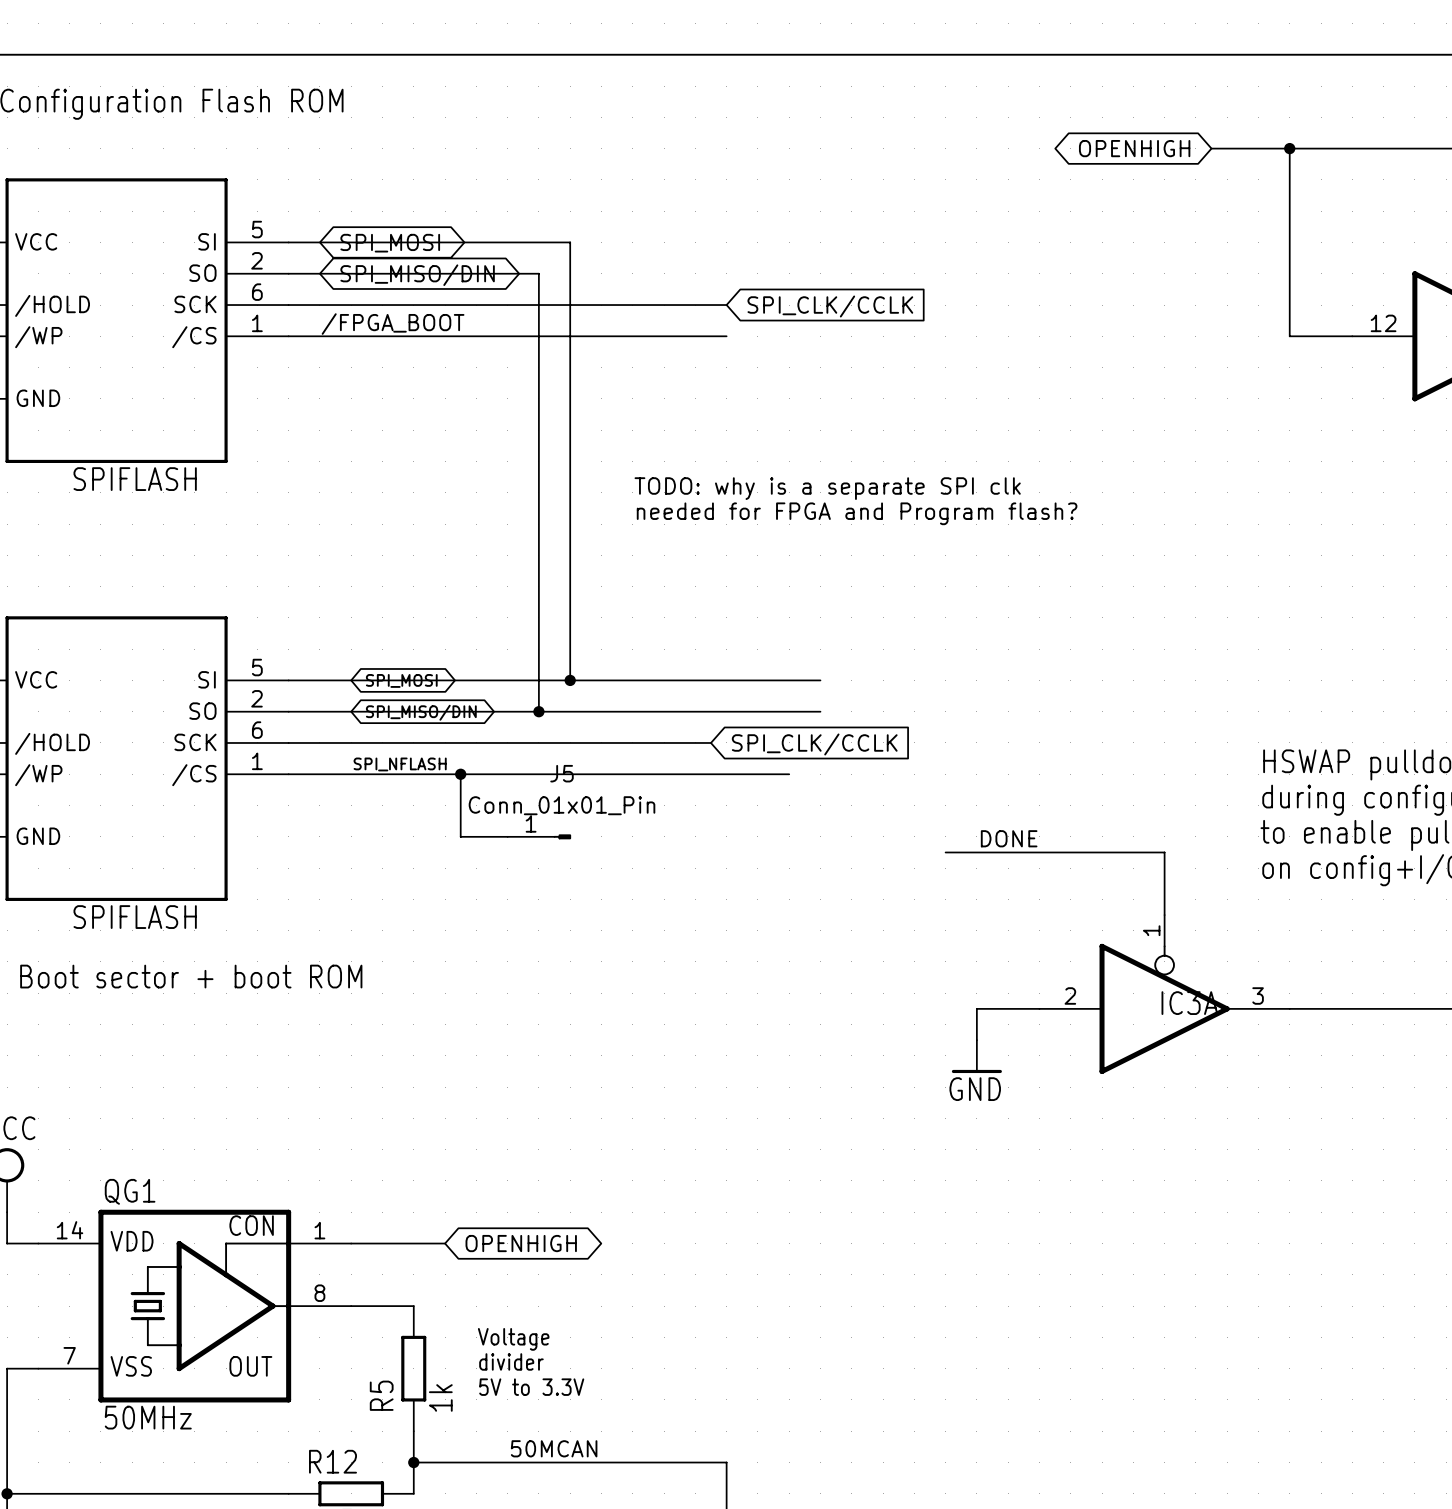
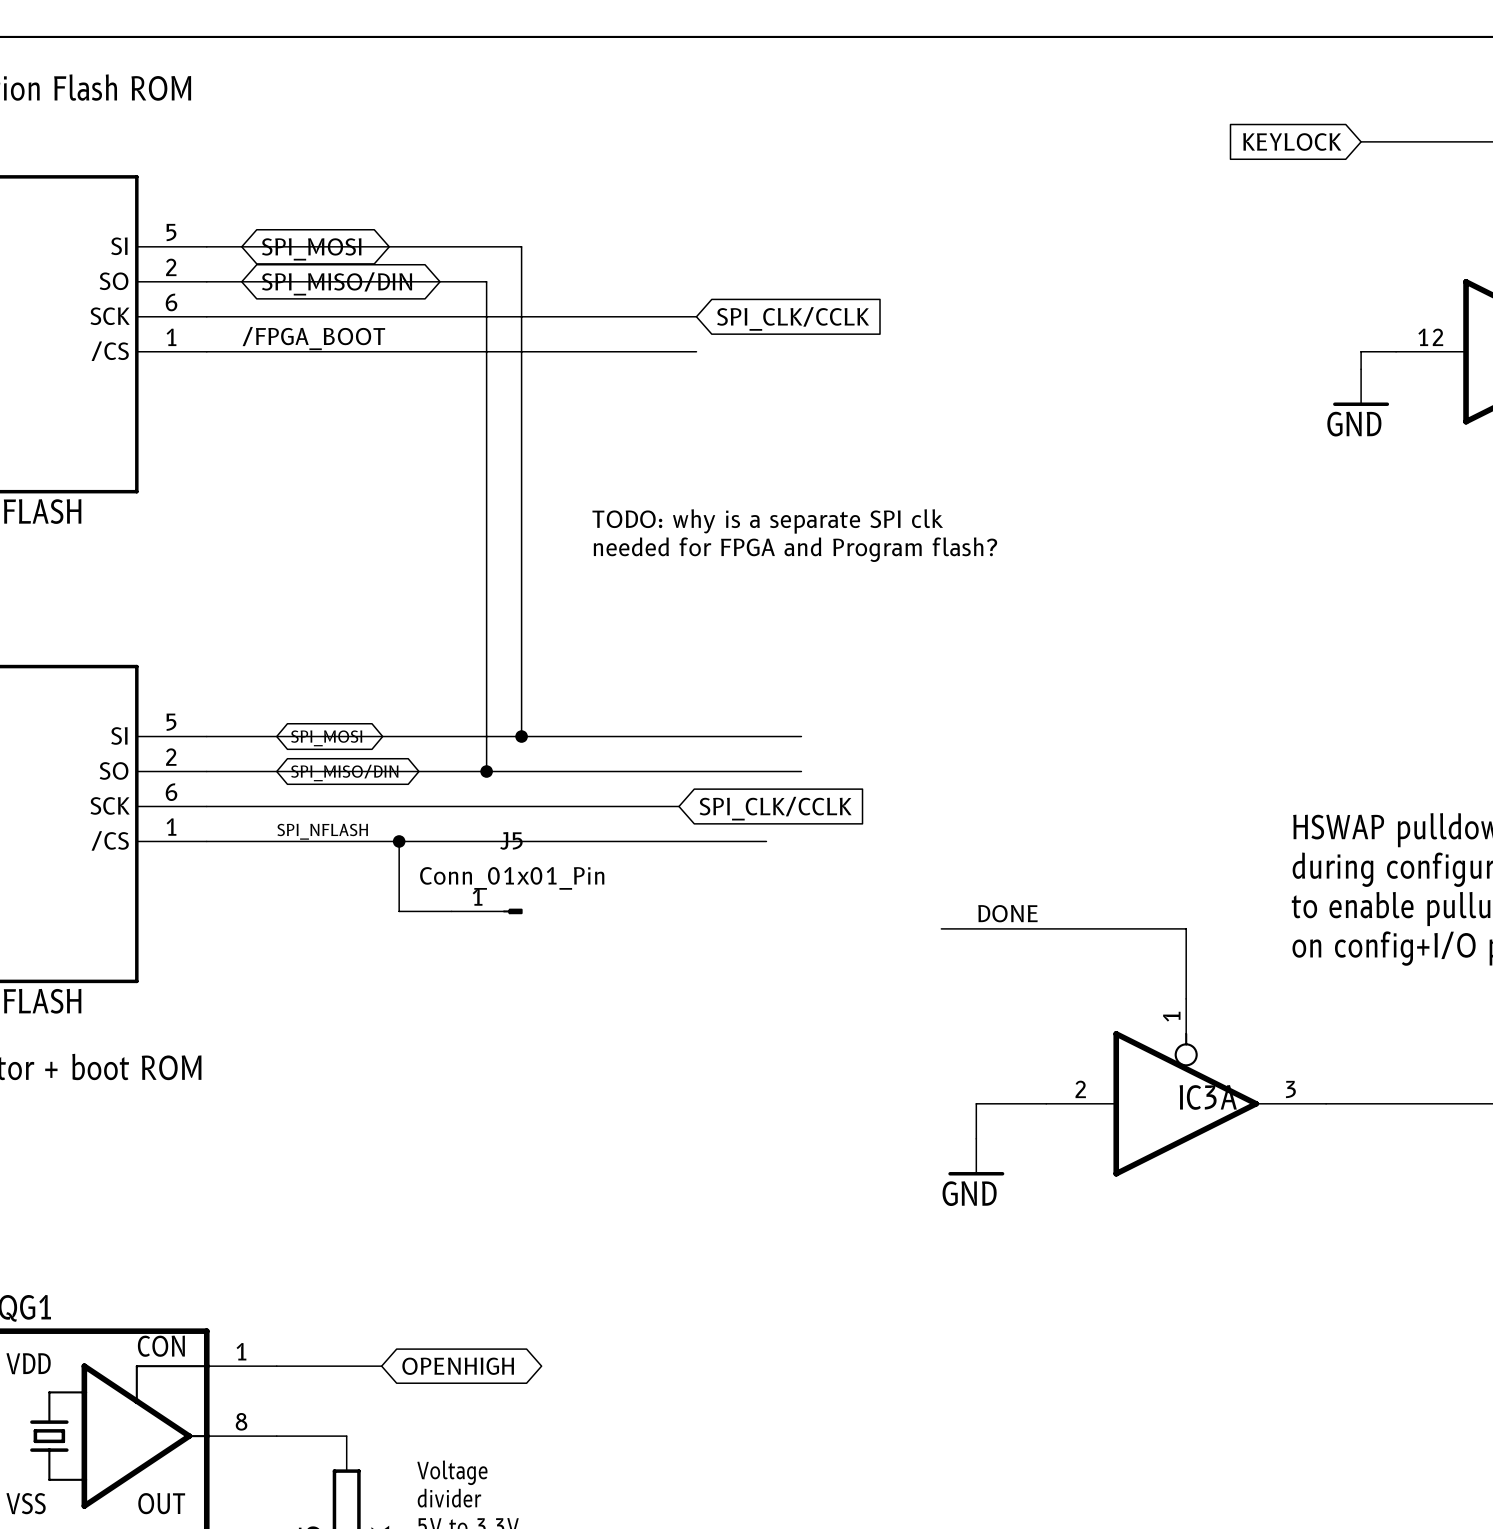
global label: OPENHIGH (1134, 148) -> none
wire: (1211, 148) (1321, 148) -> none
global label: none -> KEYLOCK (1292, 141)
wire: (1289, 148) (1289, 336) (1321, 336) -> (1361, 369) (1361, 351)
junction: (1289, 148) -> none
power symbol: none -> GND (1361, 387)

